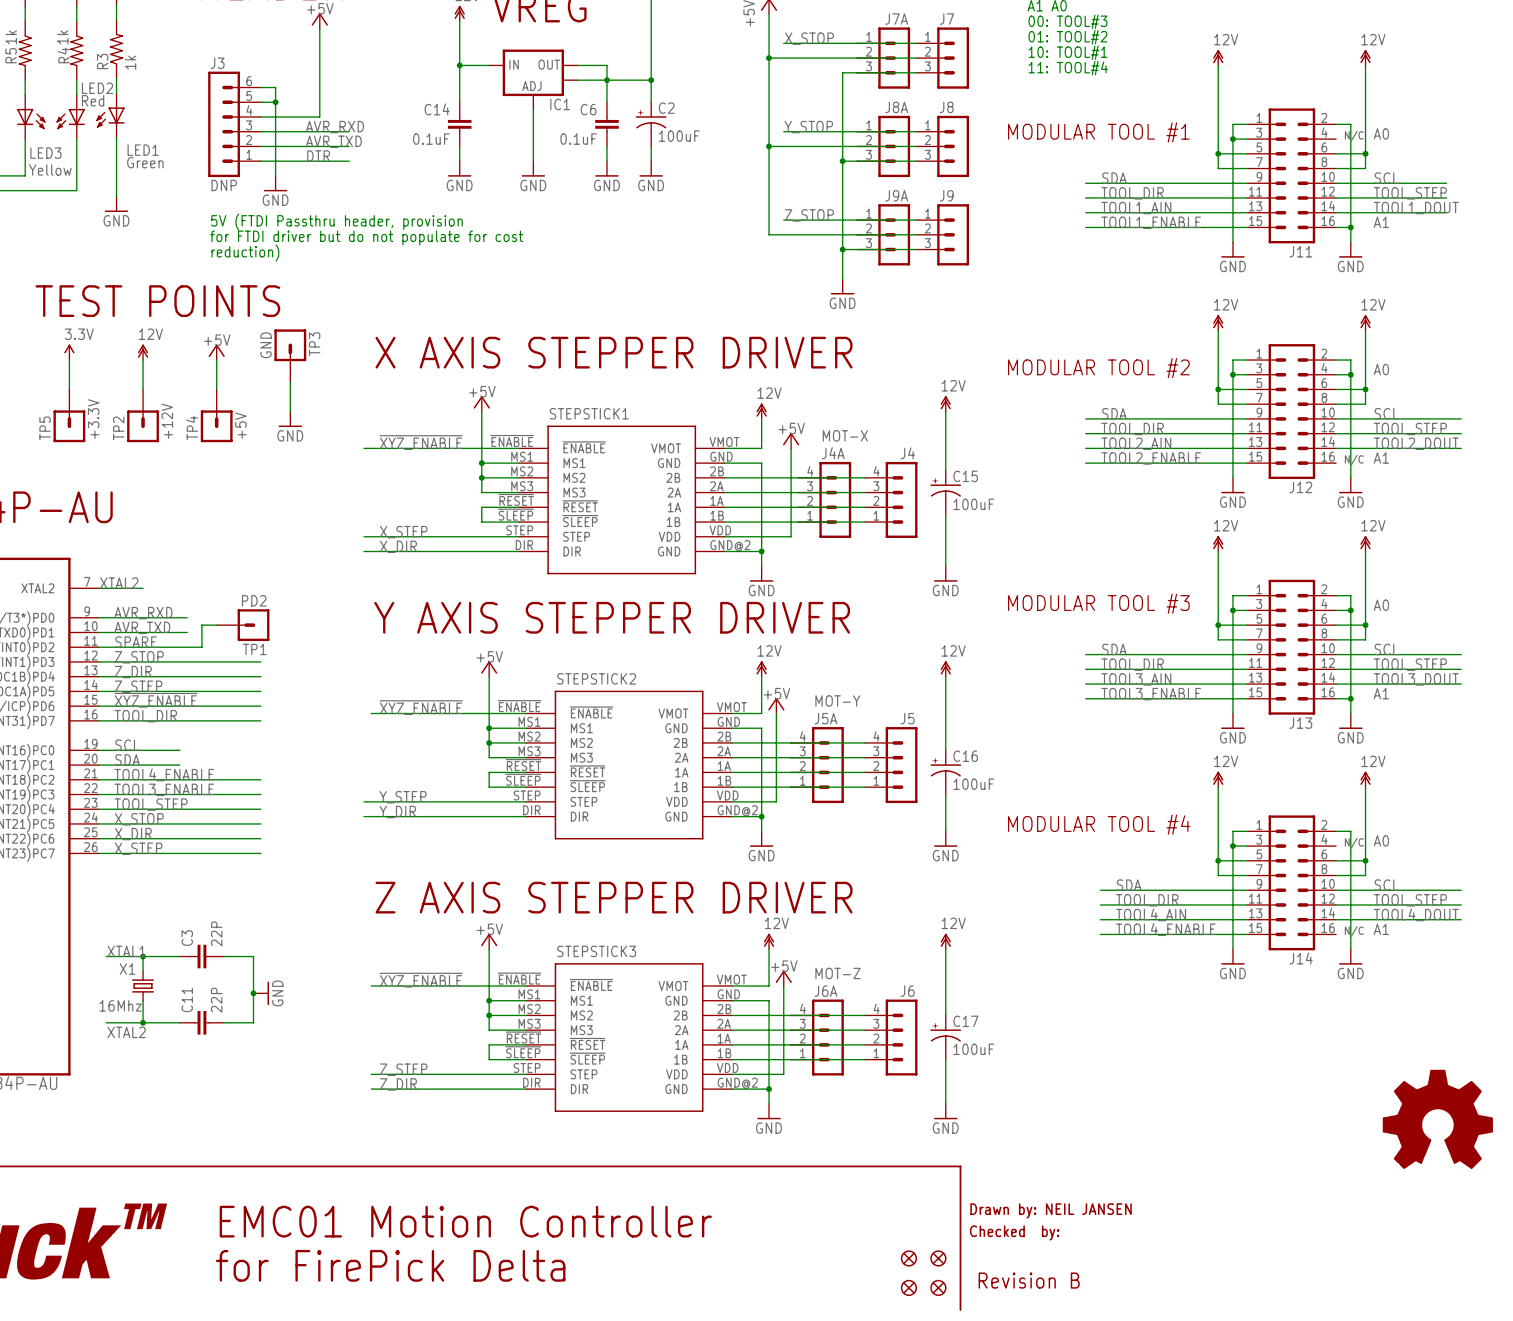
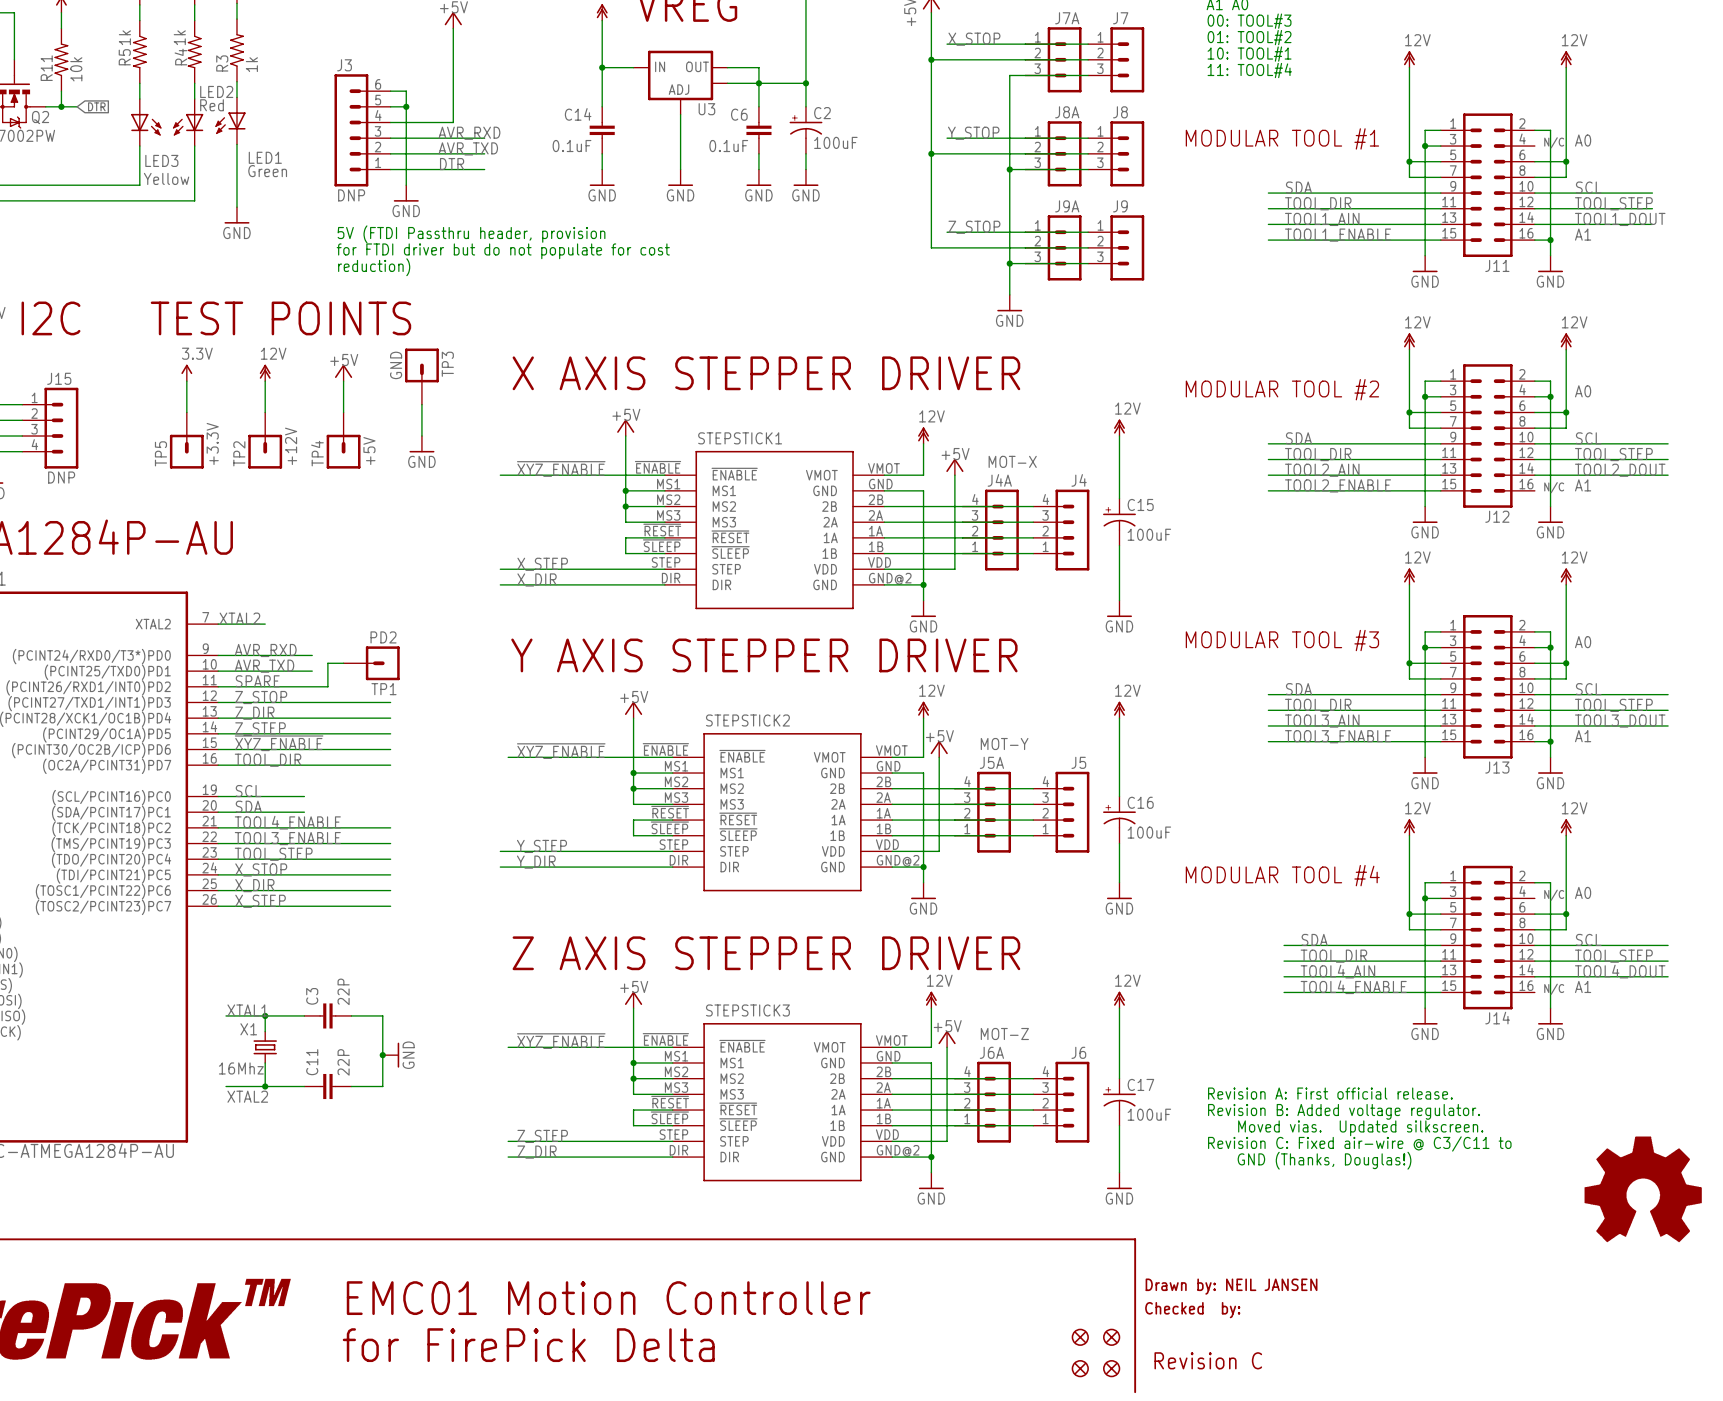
IC1 name: IC1 (560, 104) -> U3 (706, 109)
text: none -> Revision A: First official release. (1330, 1093)
text: none -> Revision B: Added voltage regulator. (1344, 1111)
text: none -> Moved vias. Updated silkscreen. (1360, 1128)
text: none -> Revision C: Fixed air-wire @ C3/C11 to (1359, 1143)
text: none -> GND (Thanks, Douglas!) (1324, 1160)
text: Revision B (1029, 1280) -> Revision C (1208, 1360)

